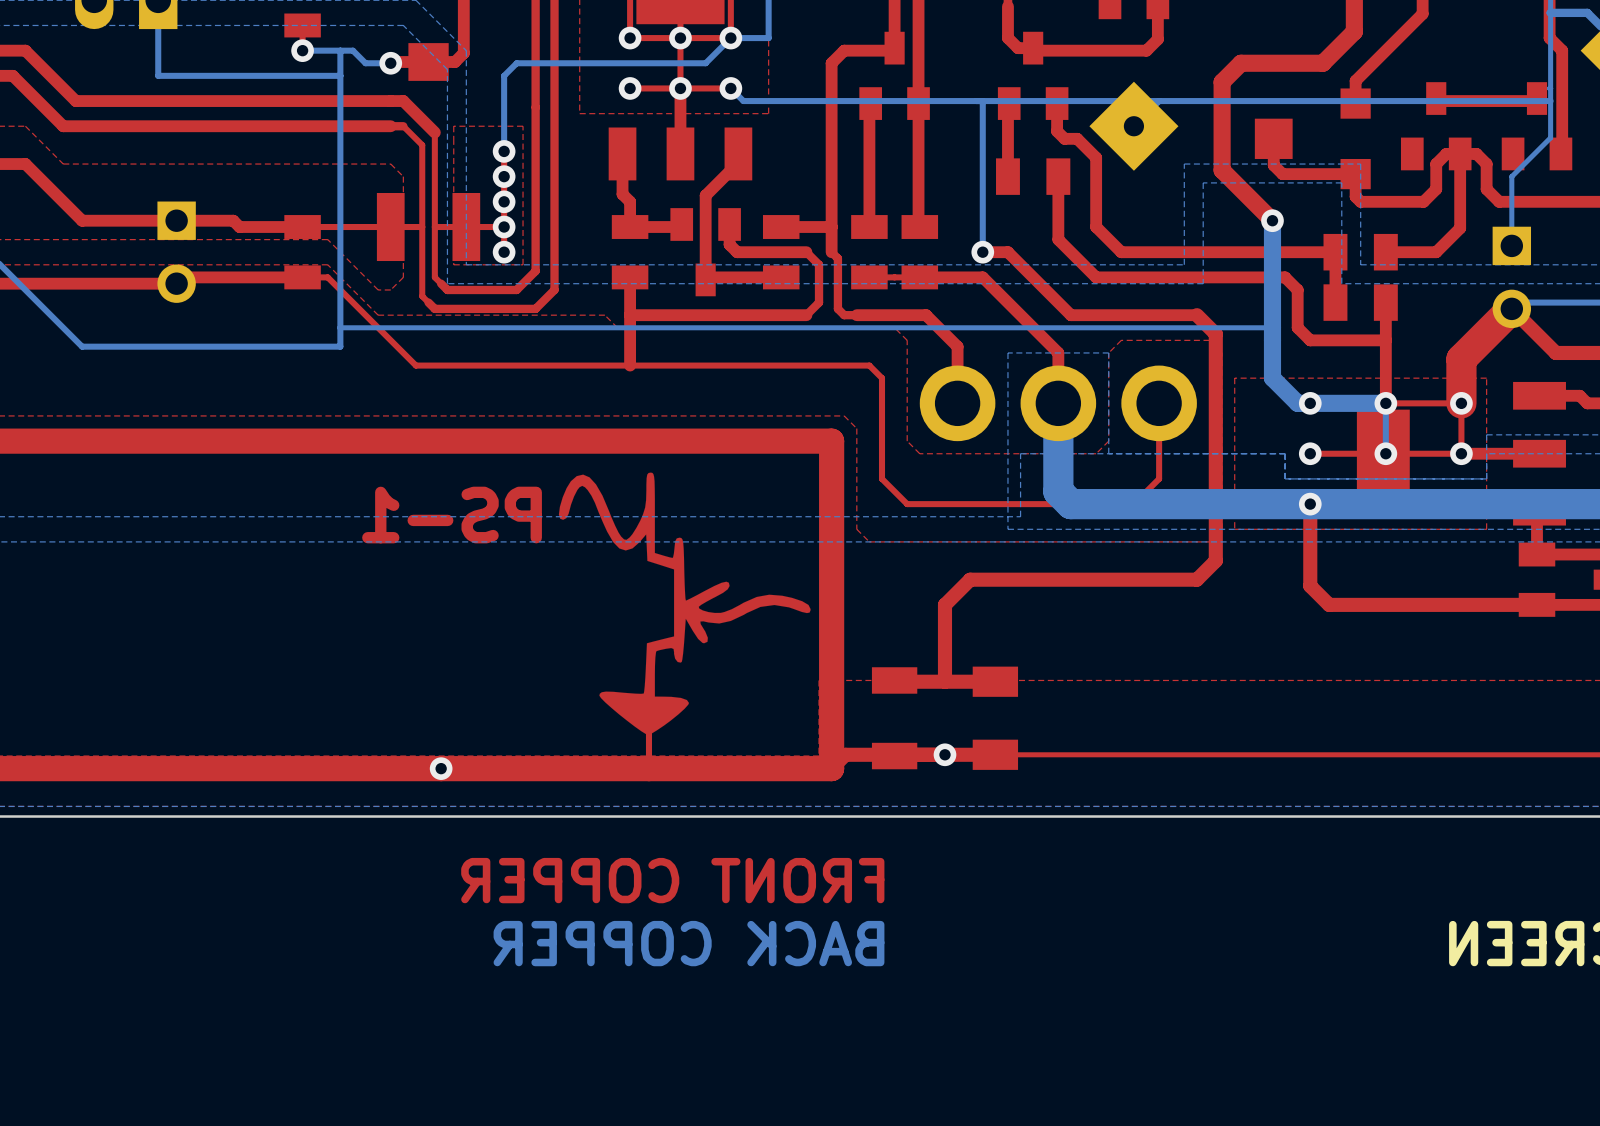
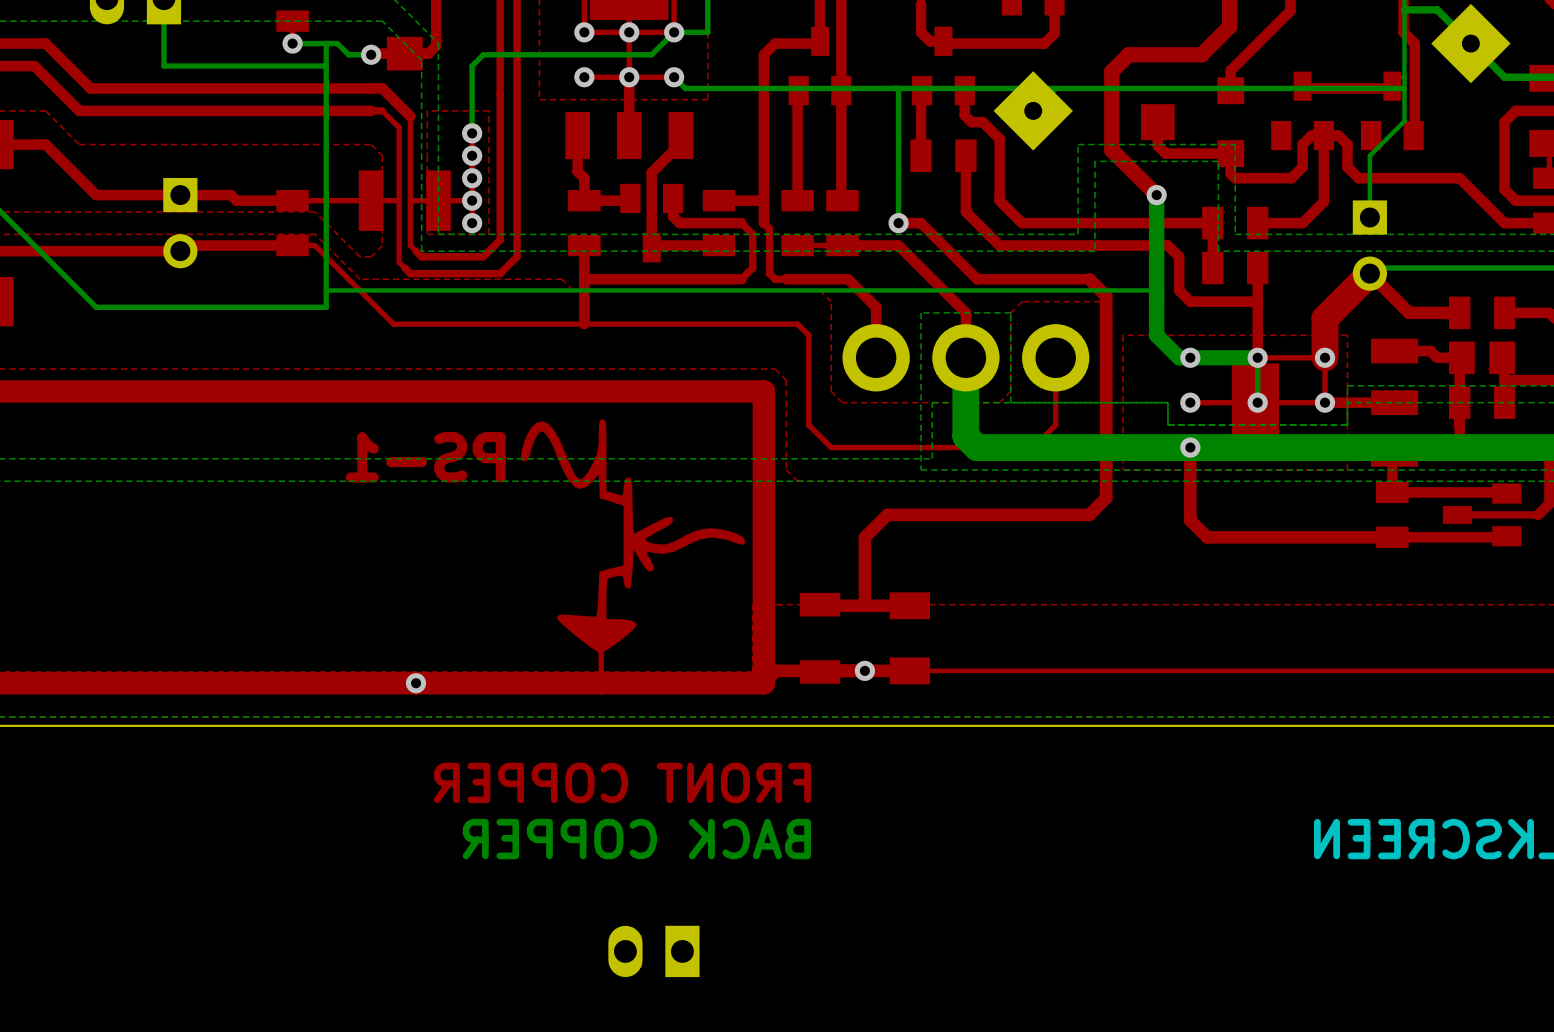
part: none -> (653, 951)

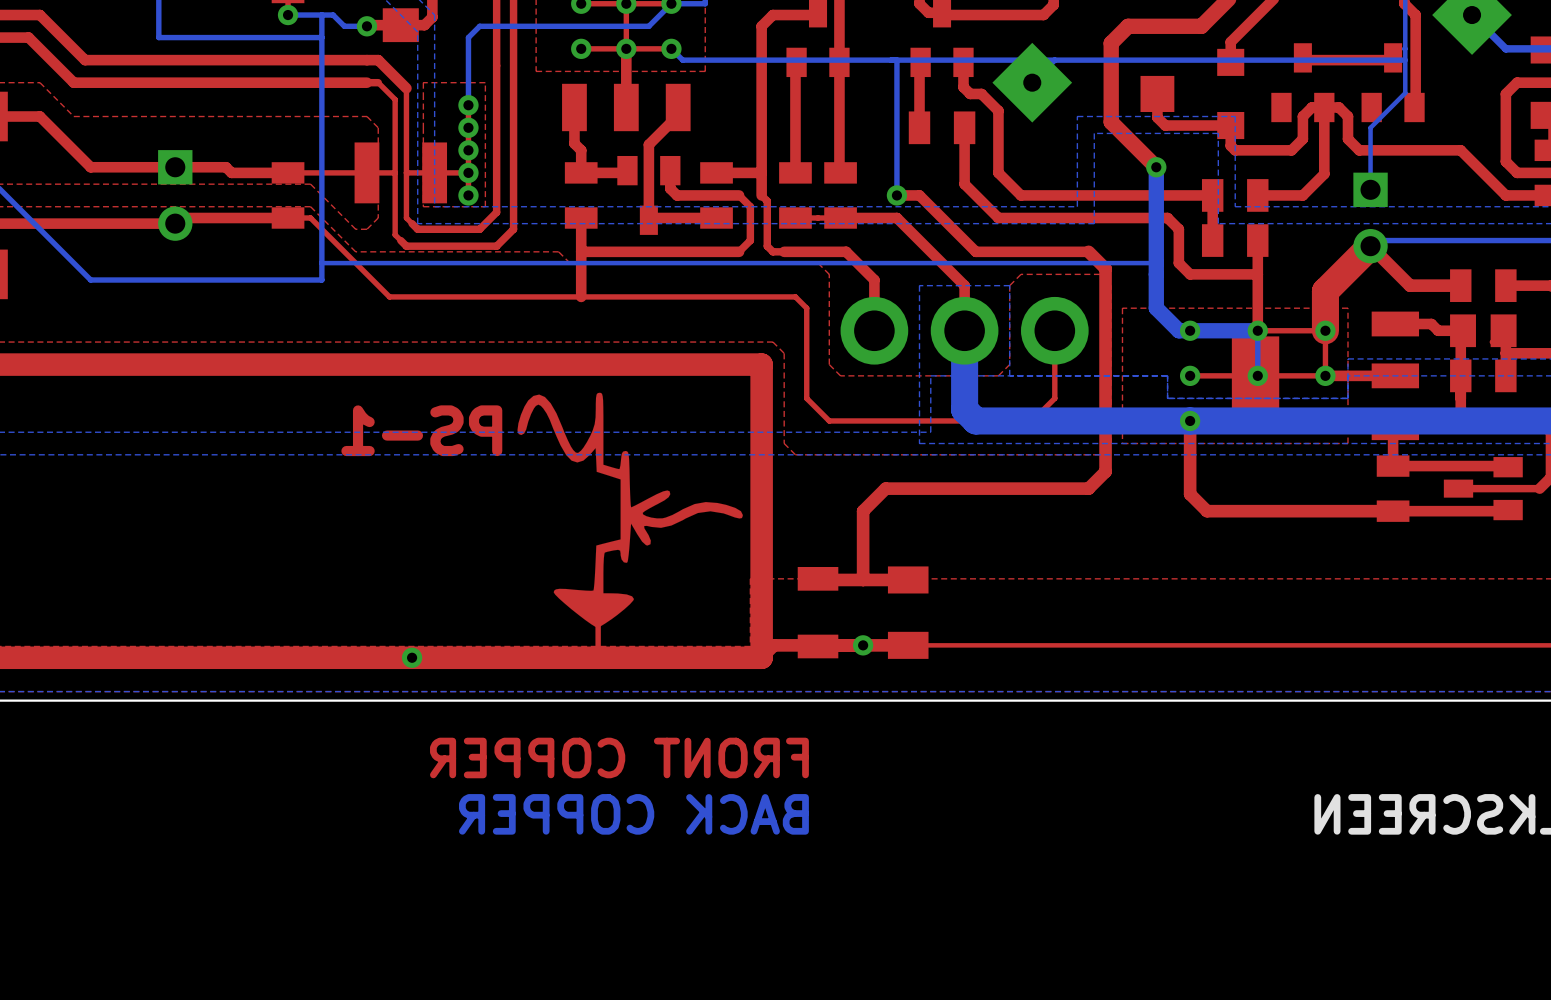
part: (653, 951) -> none

